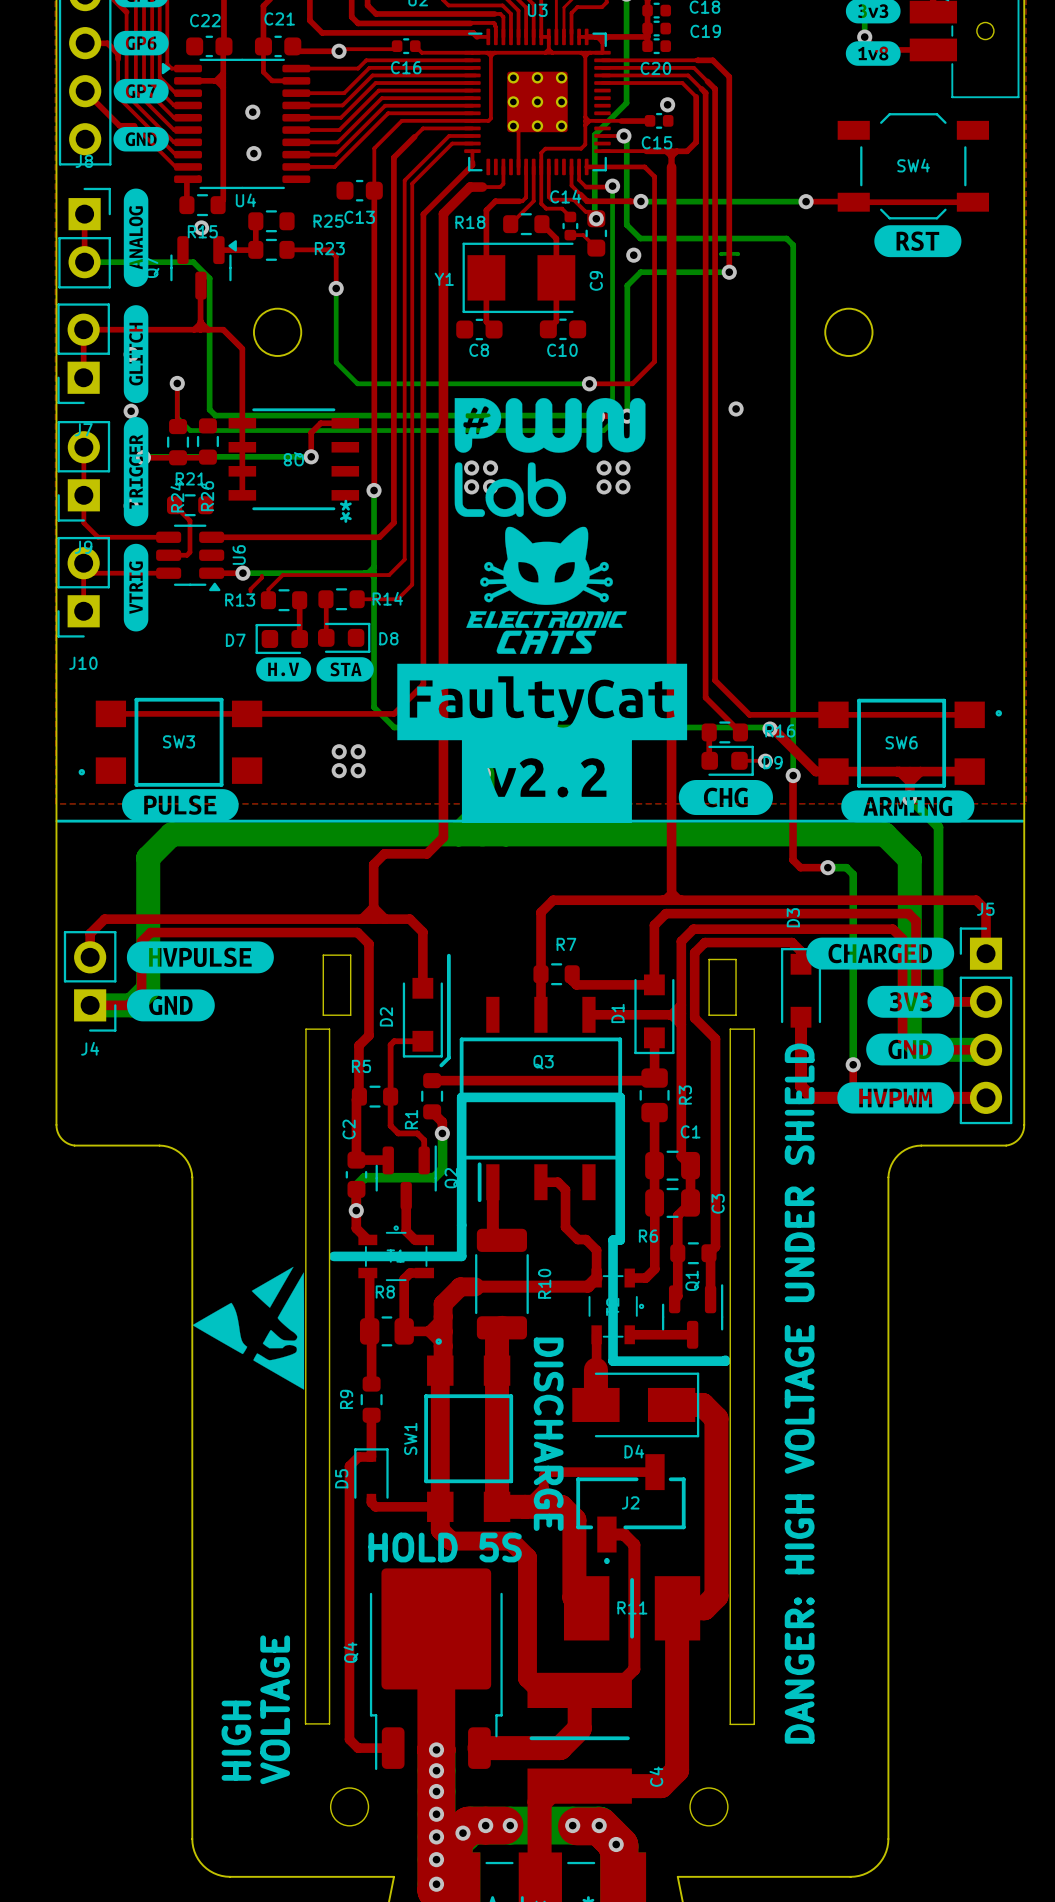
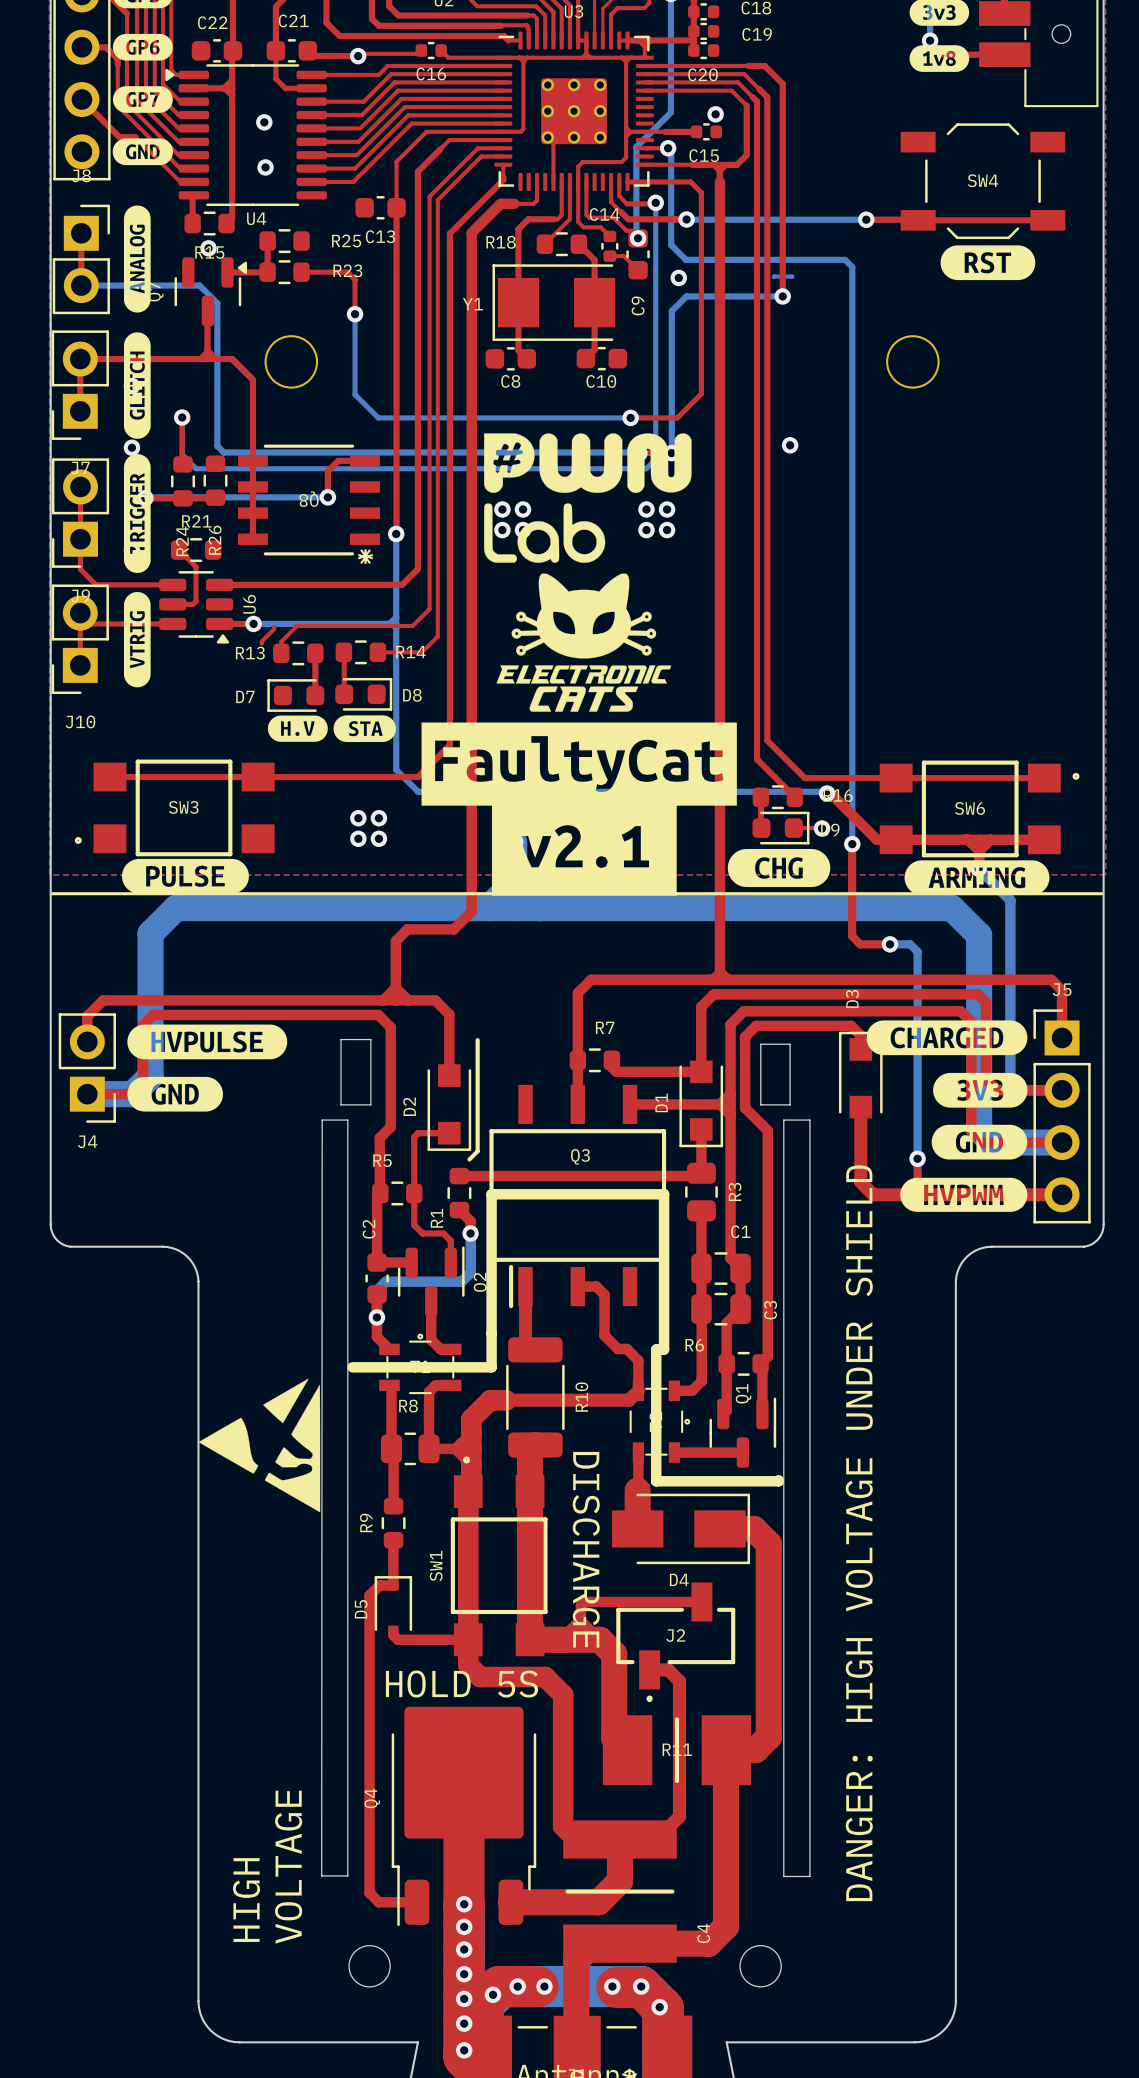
drawing shape: [461, 732, 632, 823] -> [491, 797, 677, 896]

